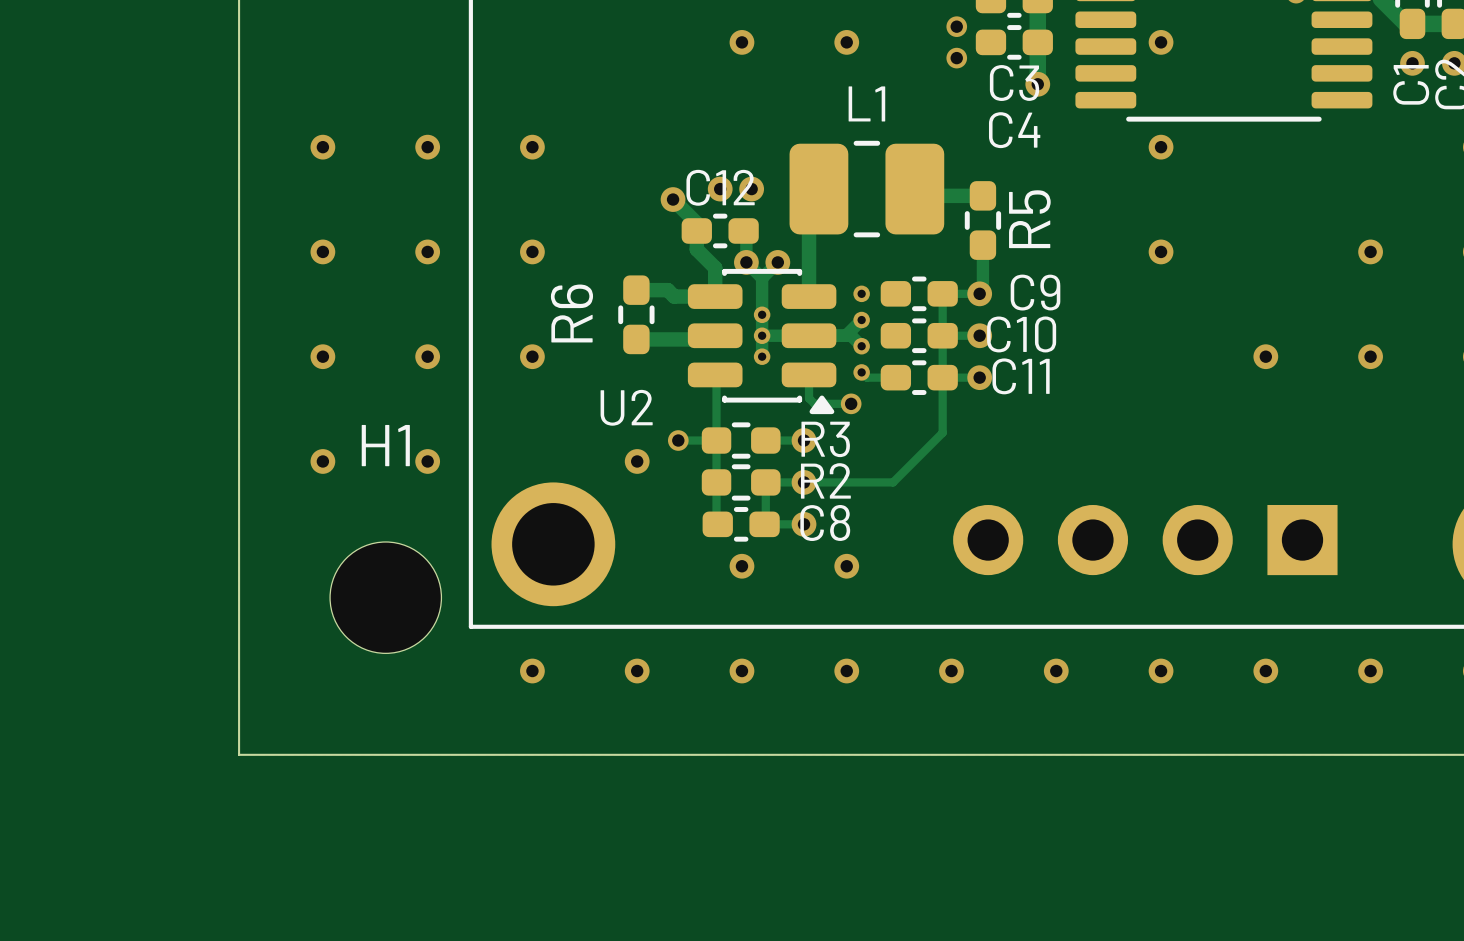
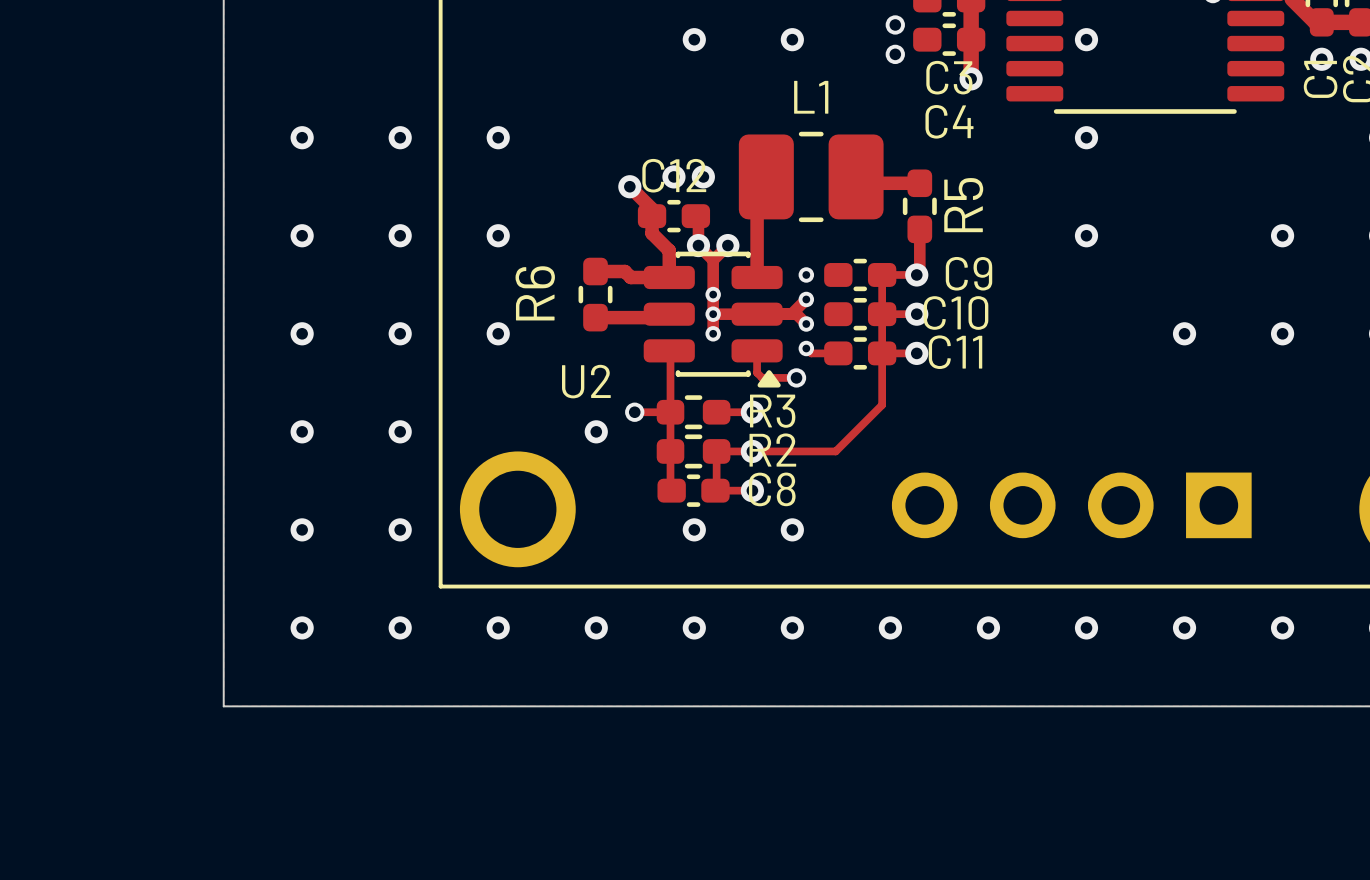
via: none -> (302, 529)
via: none -> (400, 529)
H1: (385, 597) -> none
via: none -> (302, 627)
via: none -> (400, 627)

